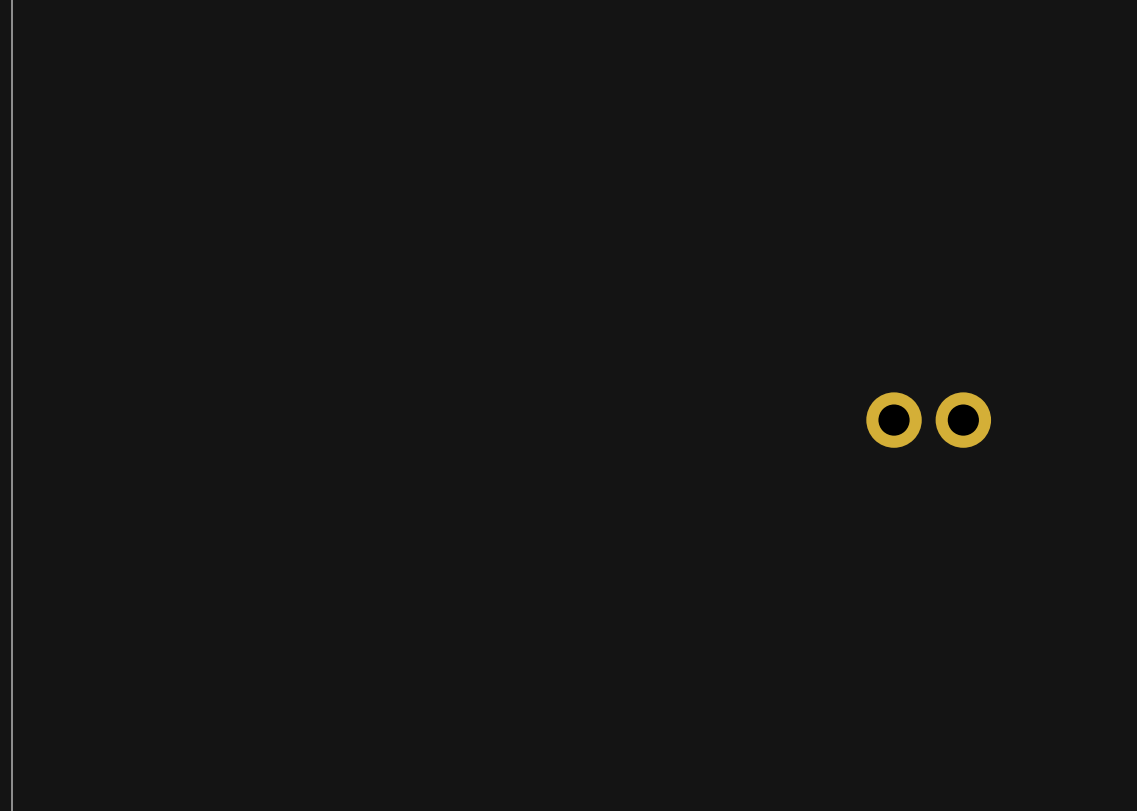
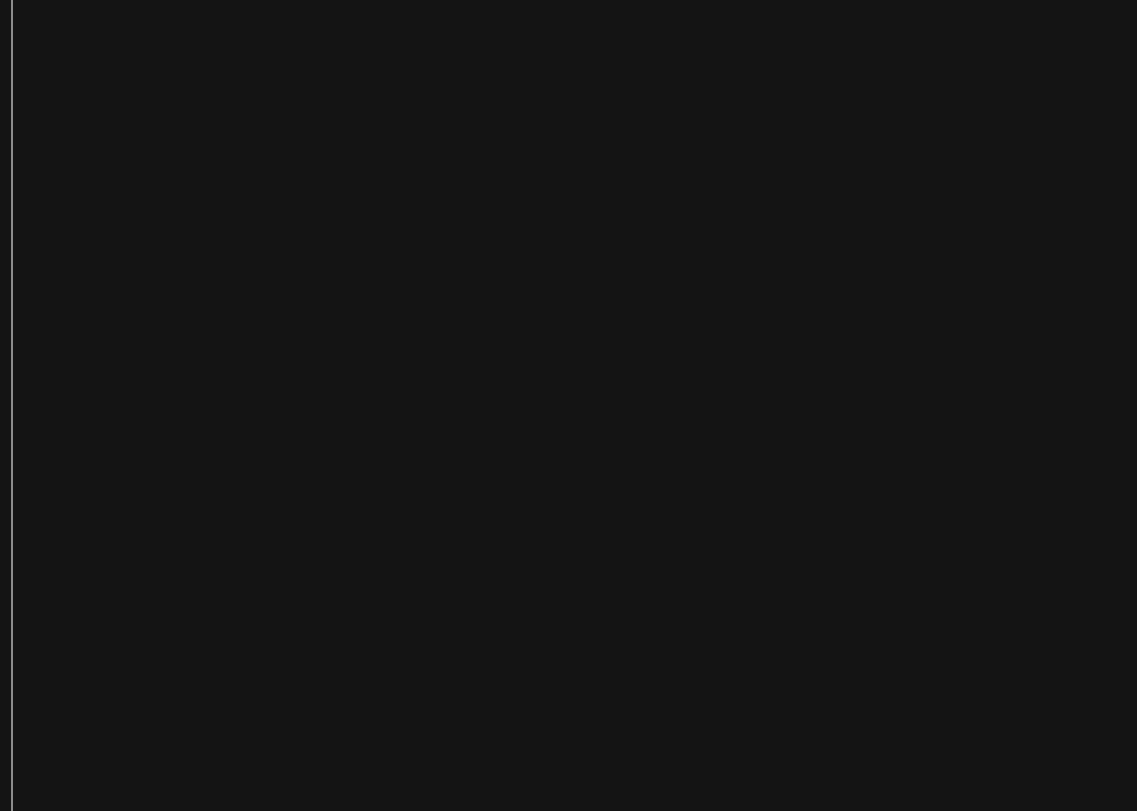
part: (928, 420) -> none

